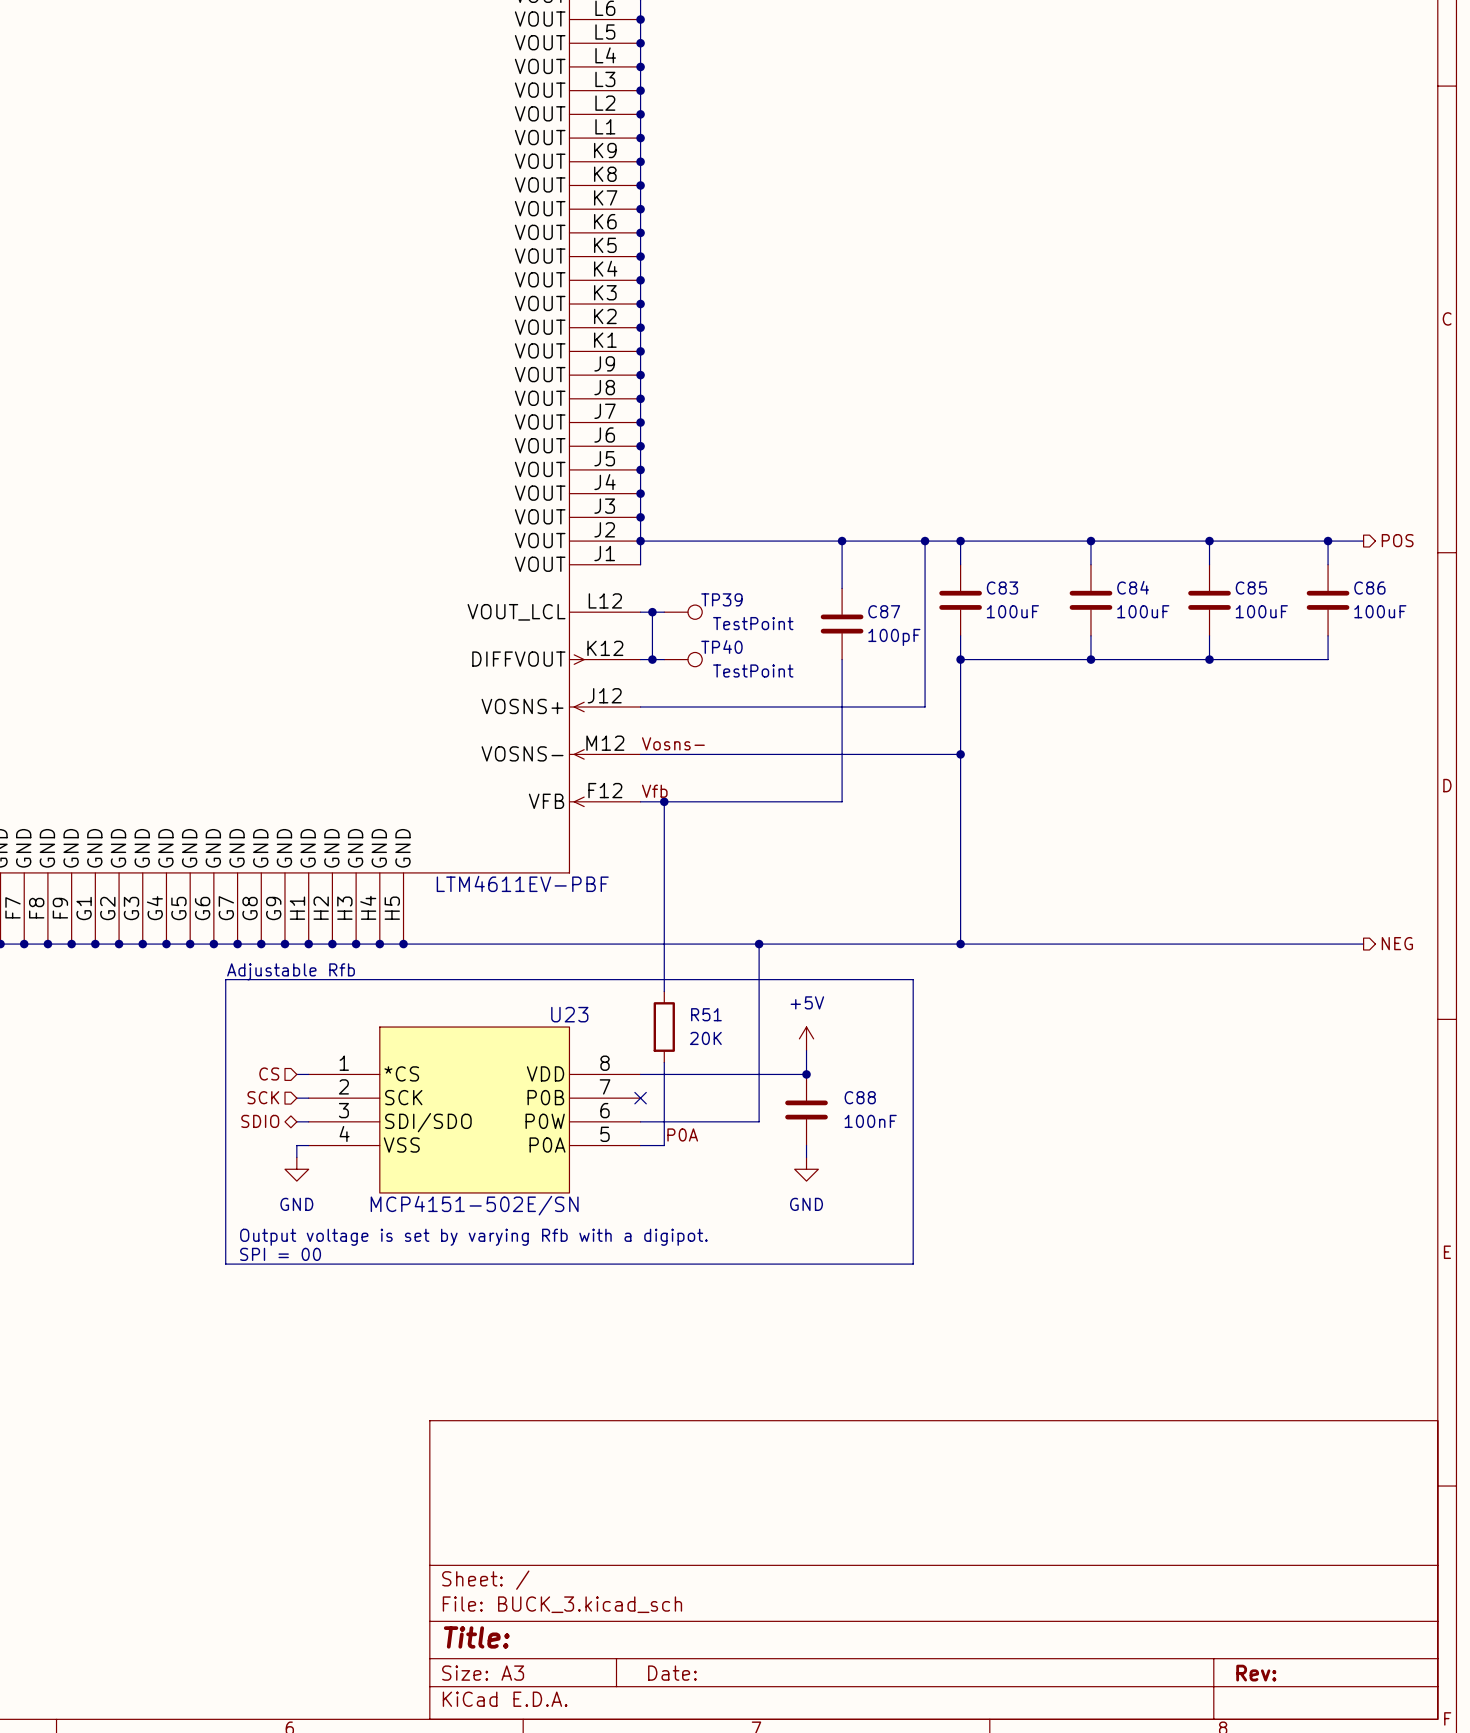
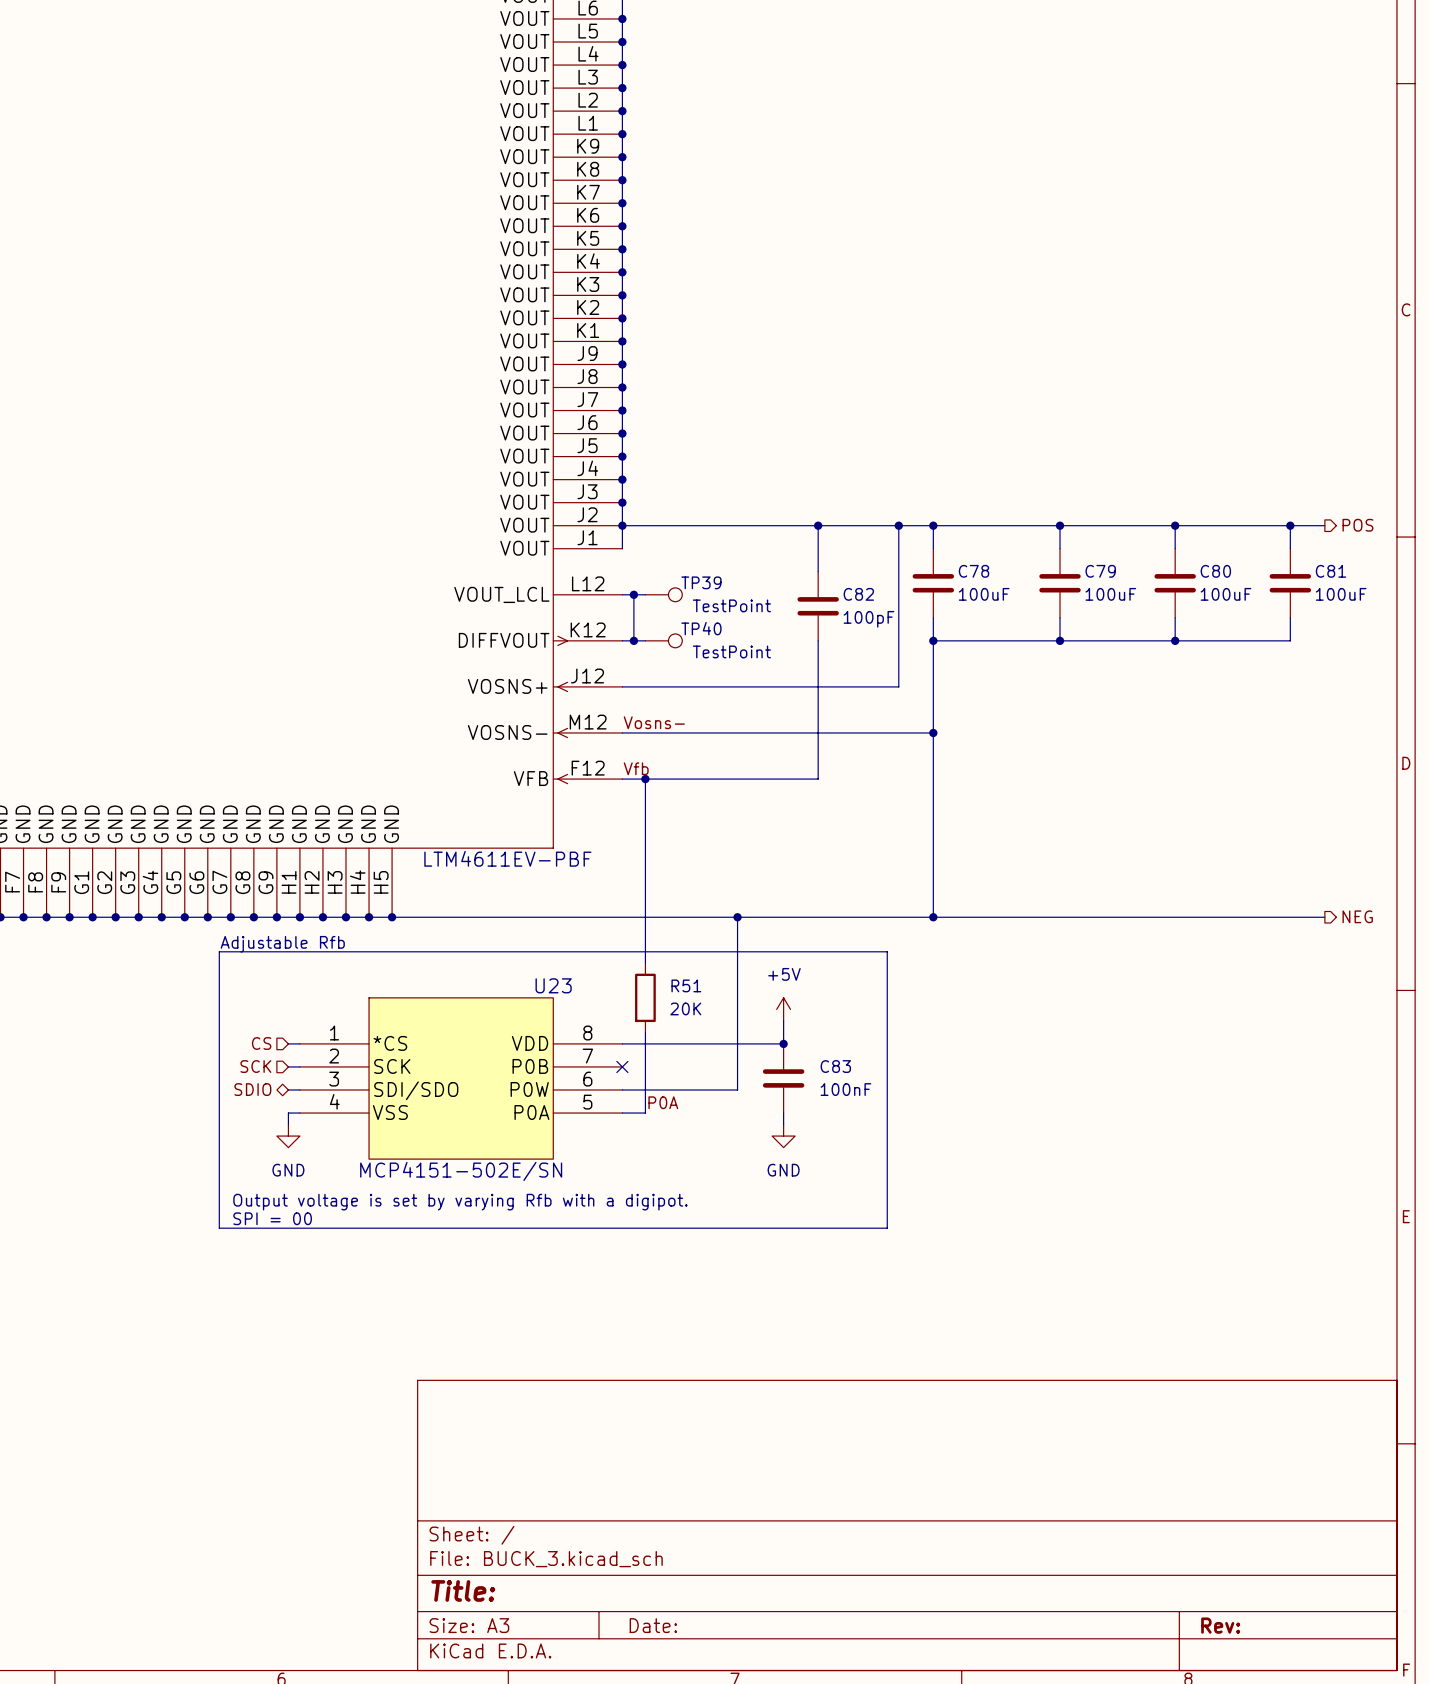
C84 name: C84 (1133, 587) -> C79 (1100, 571)
C83 name: C83 (1002, 588) -> C78 (974, 571)
C85 name: C85 (1251, 588) -> C80 (1215, 571)
C86 name: C86 (1369, 588) -> C81 (1331, 571)
C87 name: C87 (884, 611) -> C82 (858, 594)
C88 name: C88 (860, 1097) -> C83 (835, 1066)

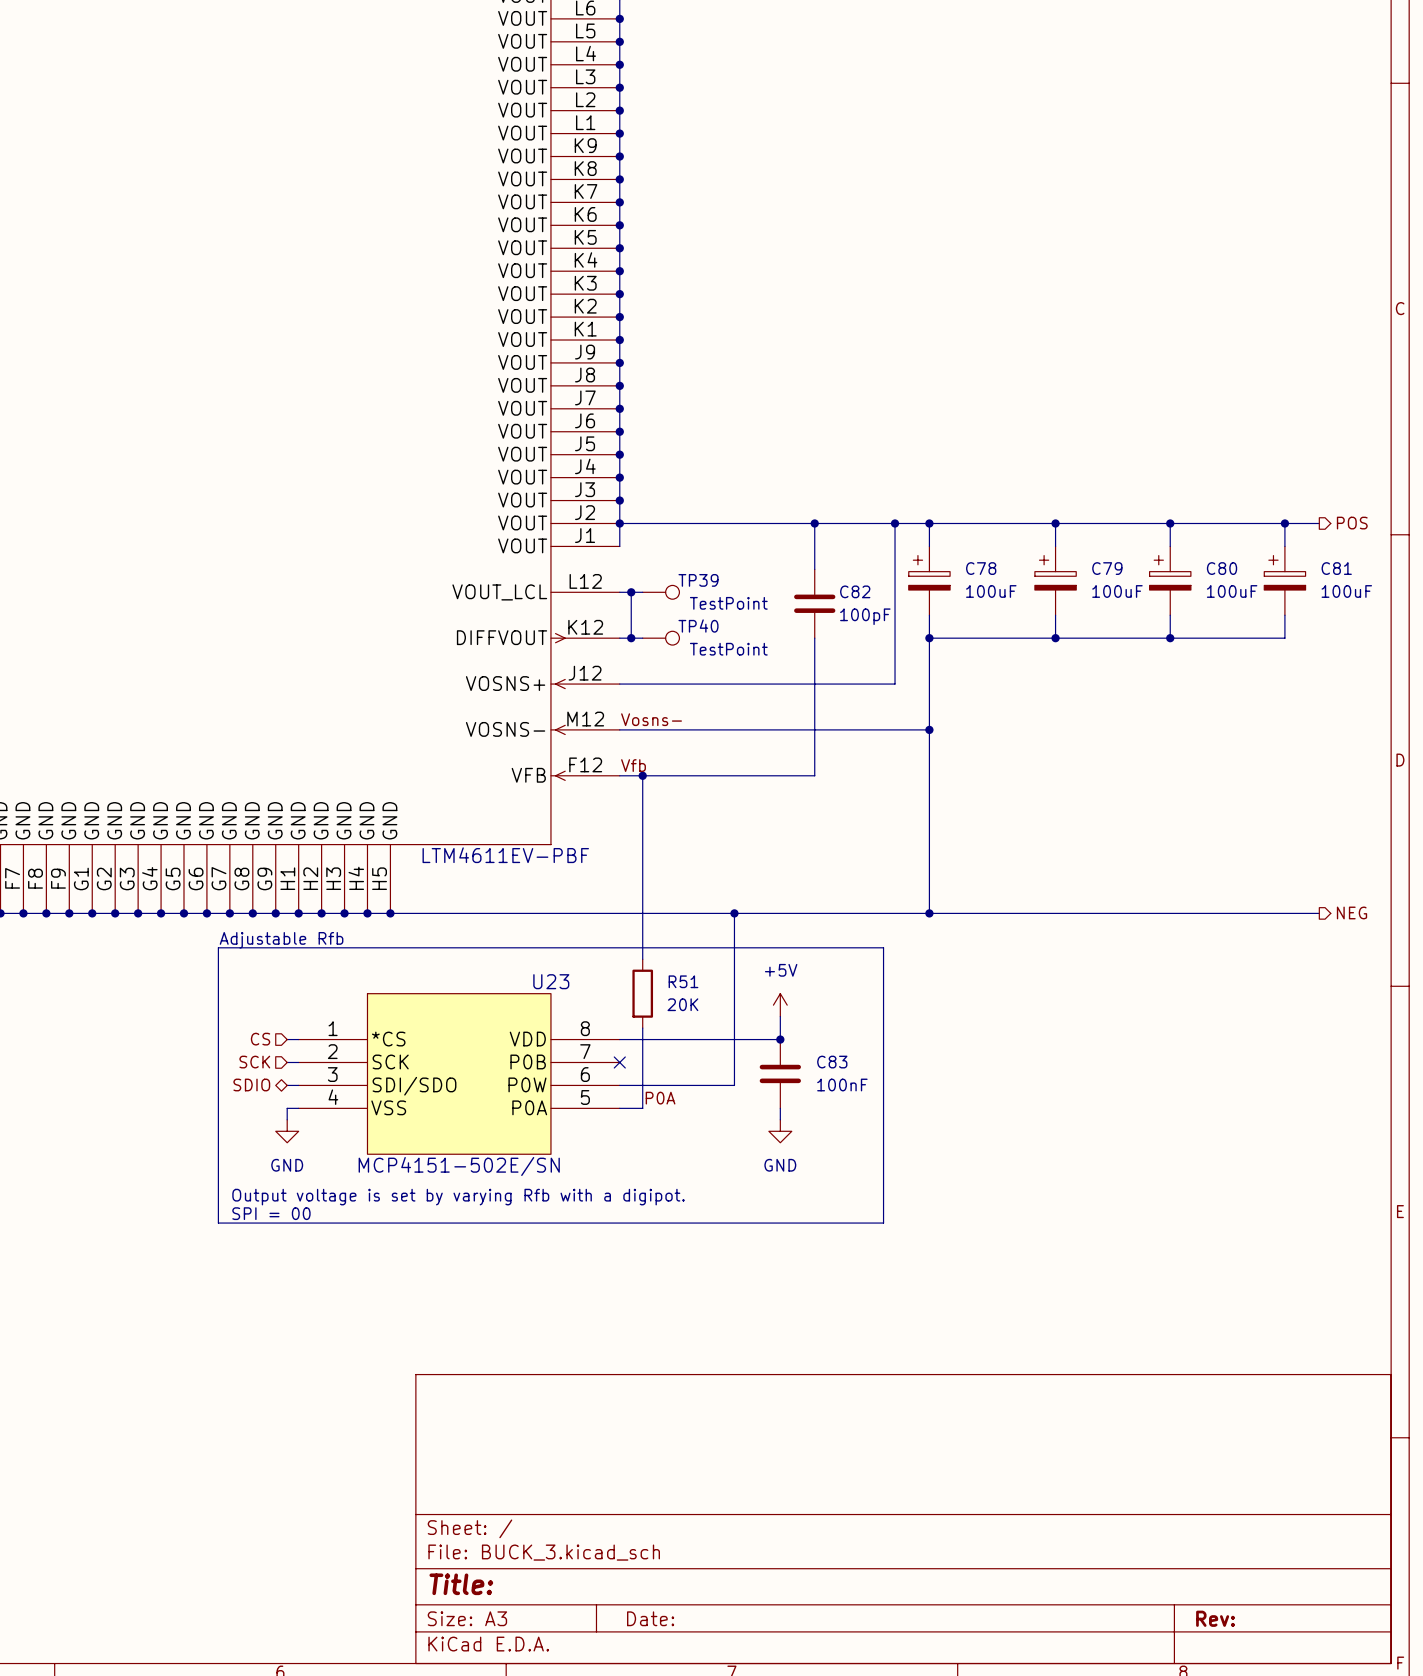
C78 symbol: [912, 548, 955, 618] -> [908, 546, 951, 616]
C79 symbol: [1039, 548, 1081, 618] -> [1034, 546, 1077, 616]
C80 symbol: [1154, 548, 1196, 618] -> [1149, 546, 1191, 616]
C81 symbol: [1269, 548, 1312, 618] -> [1264, 546, 1306, 616]

